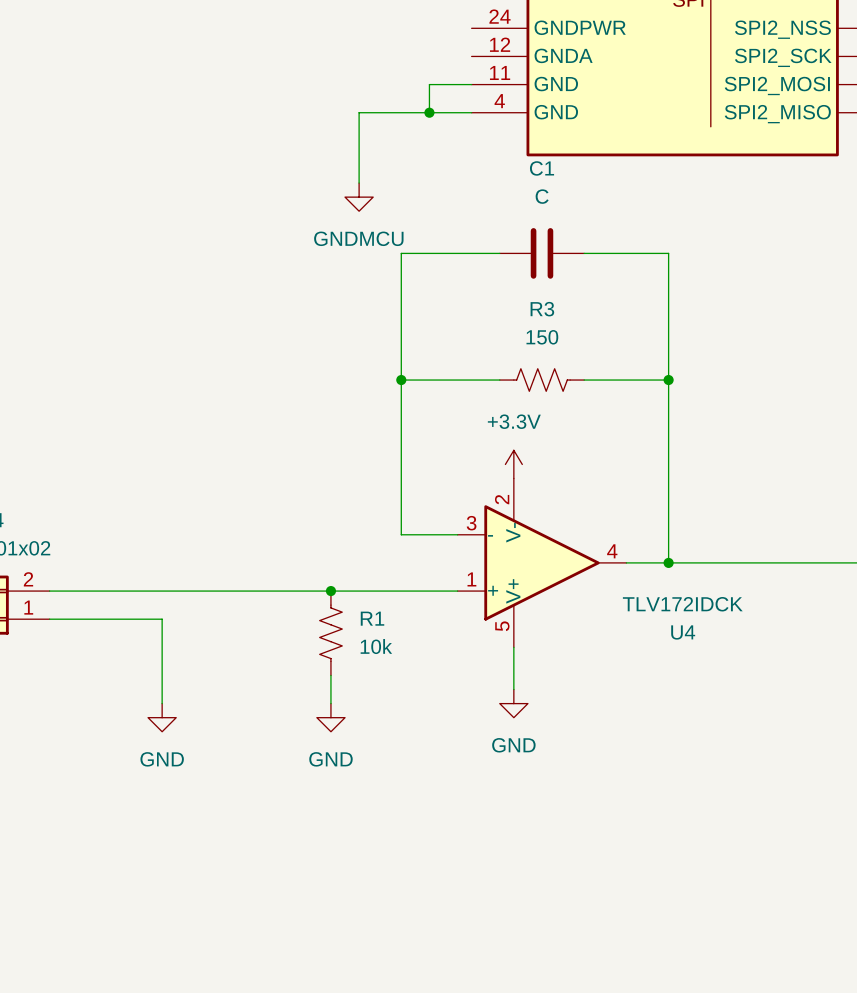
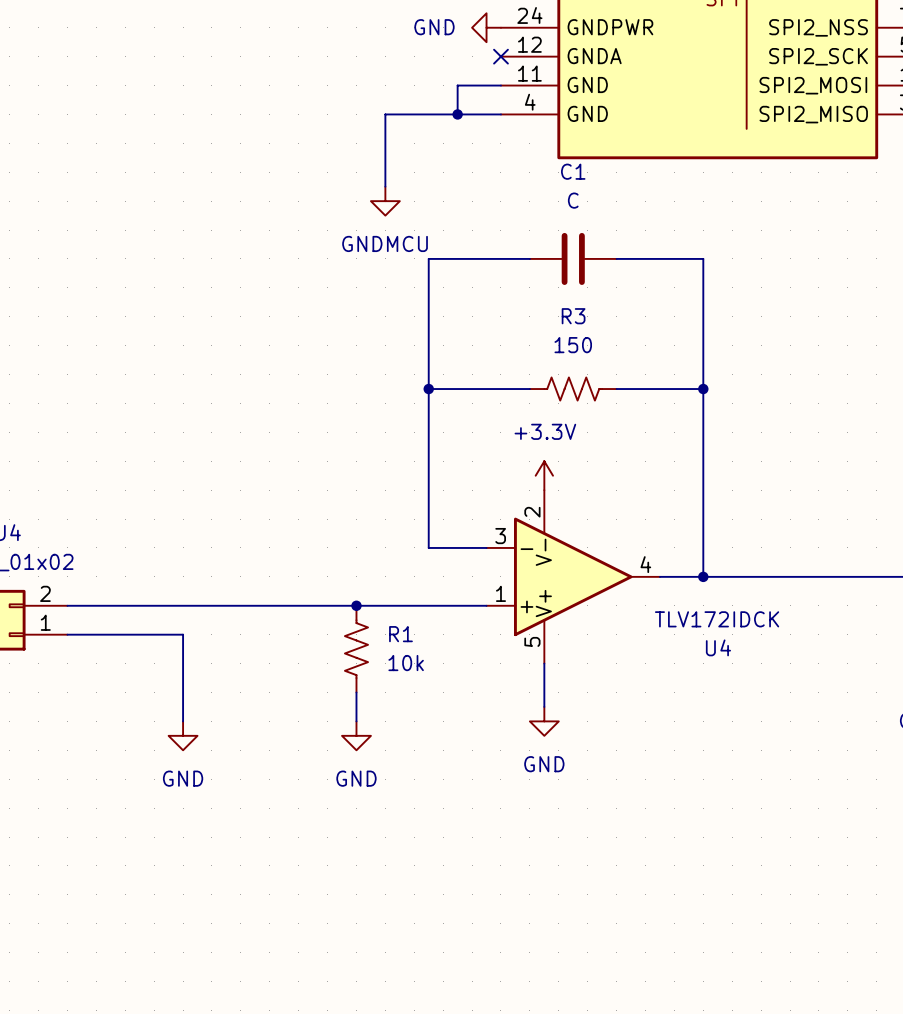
power symbol: none -> GND (486, 27)
no-connect mark: none -> (500, 56)

